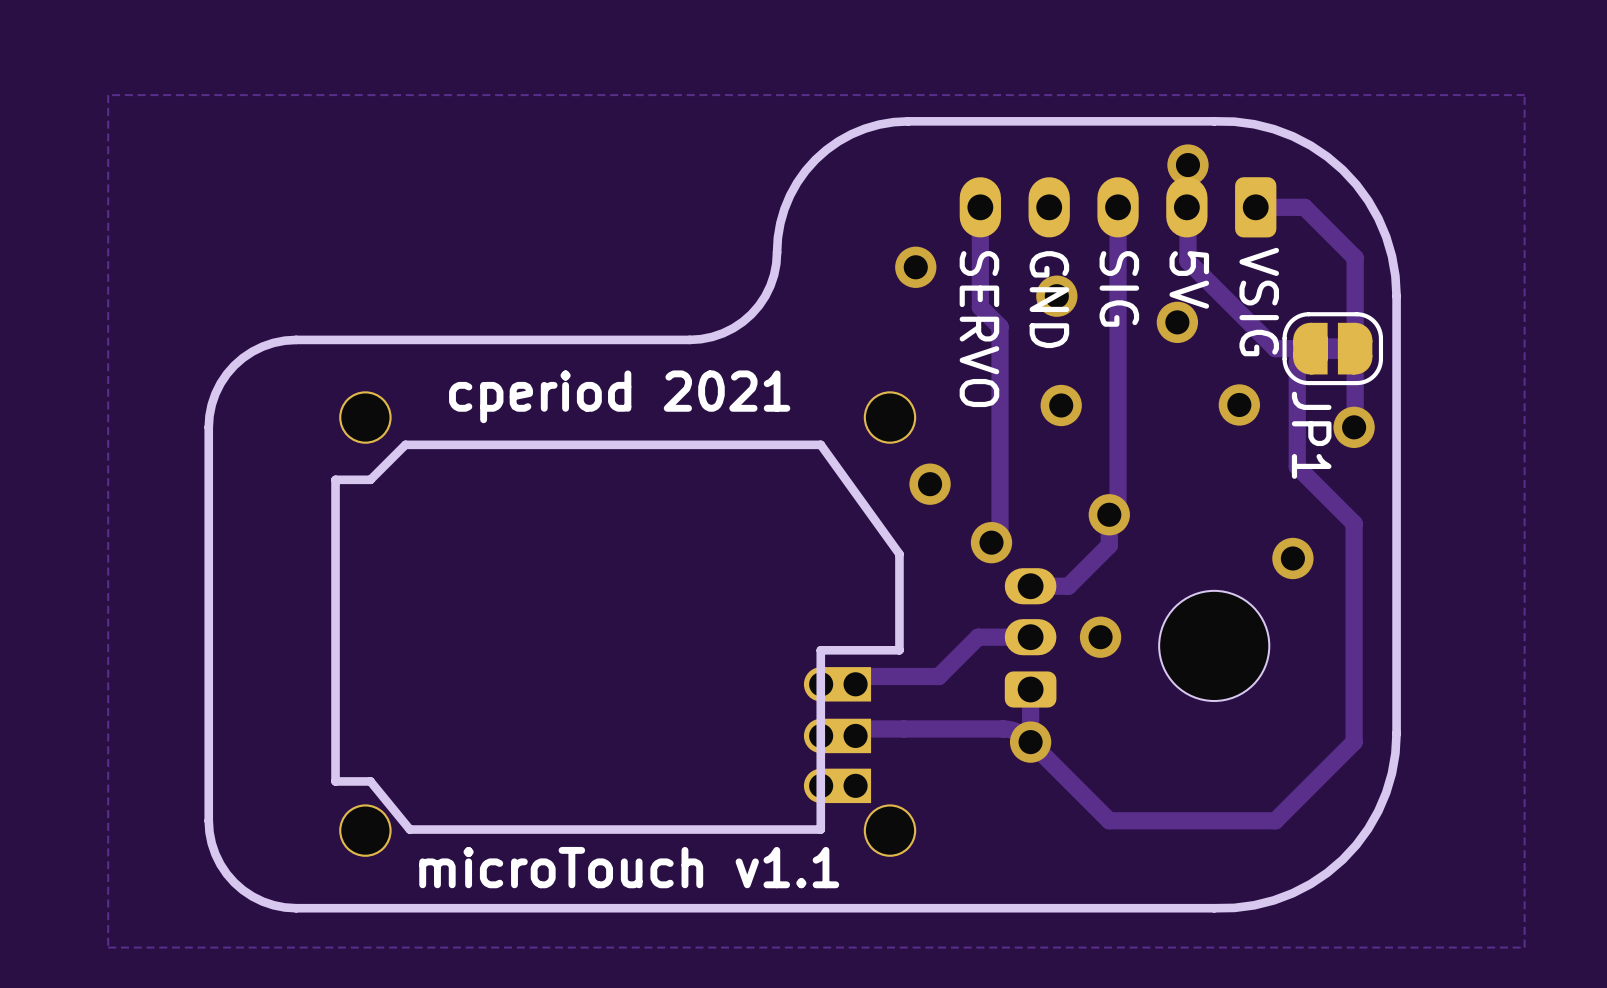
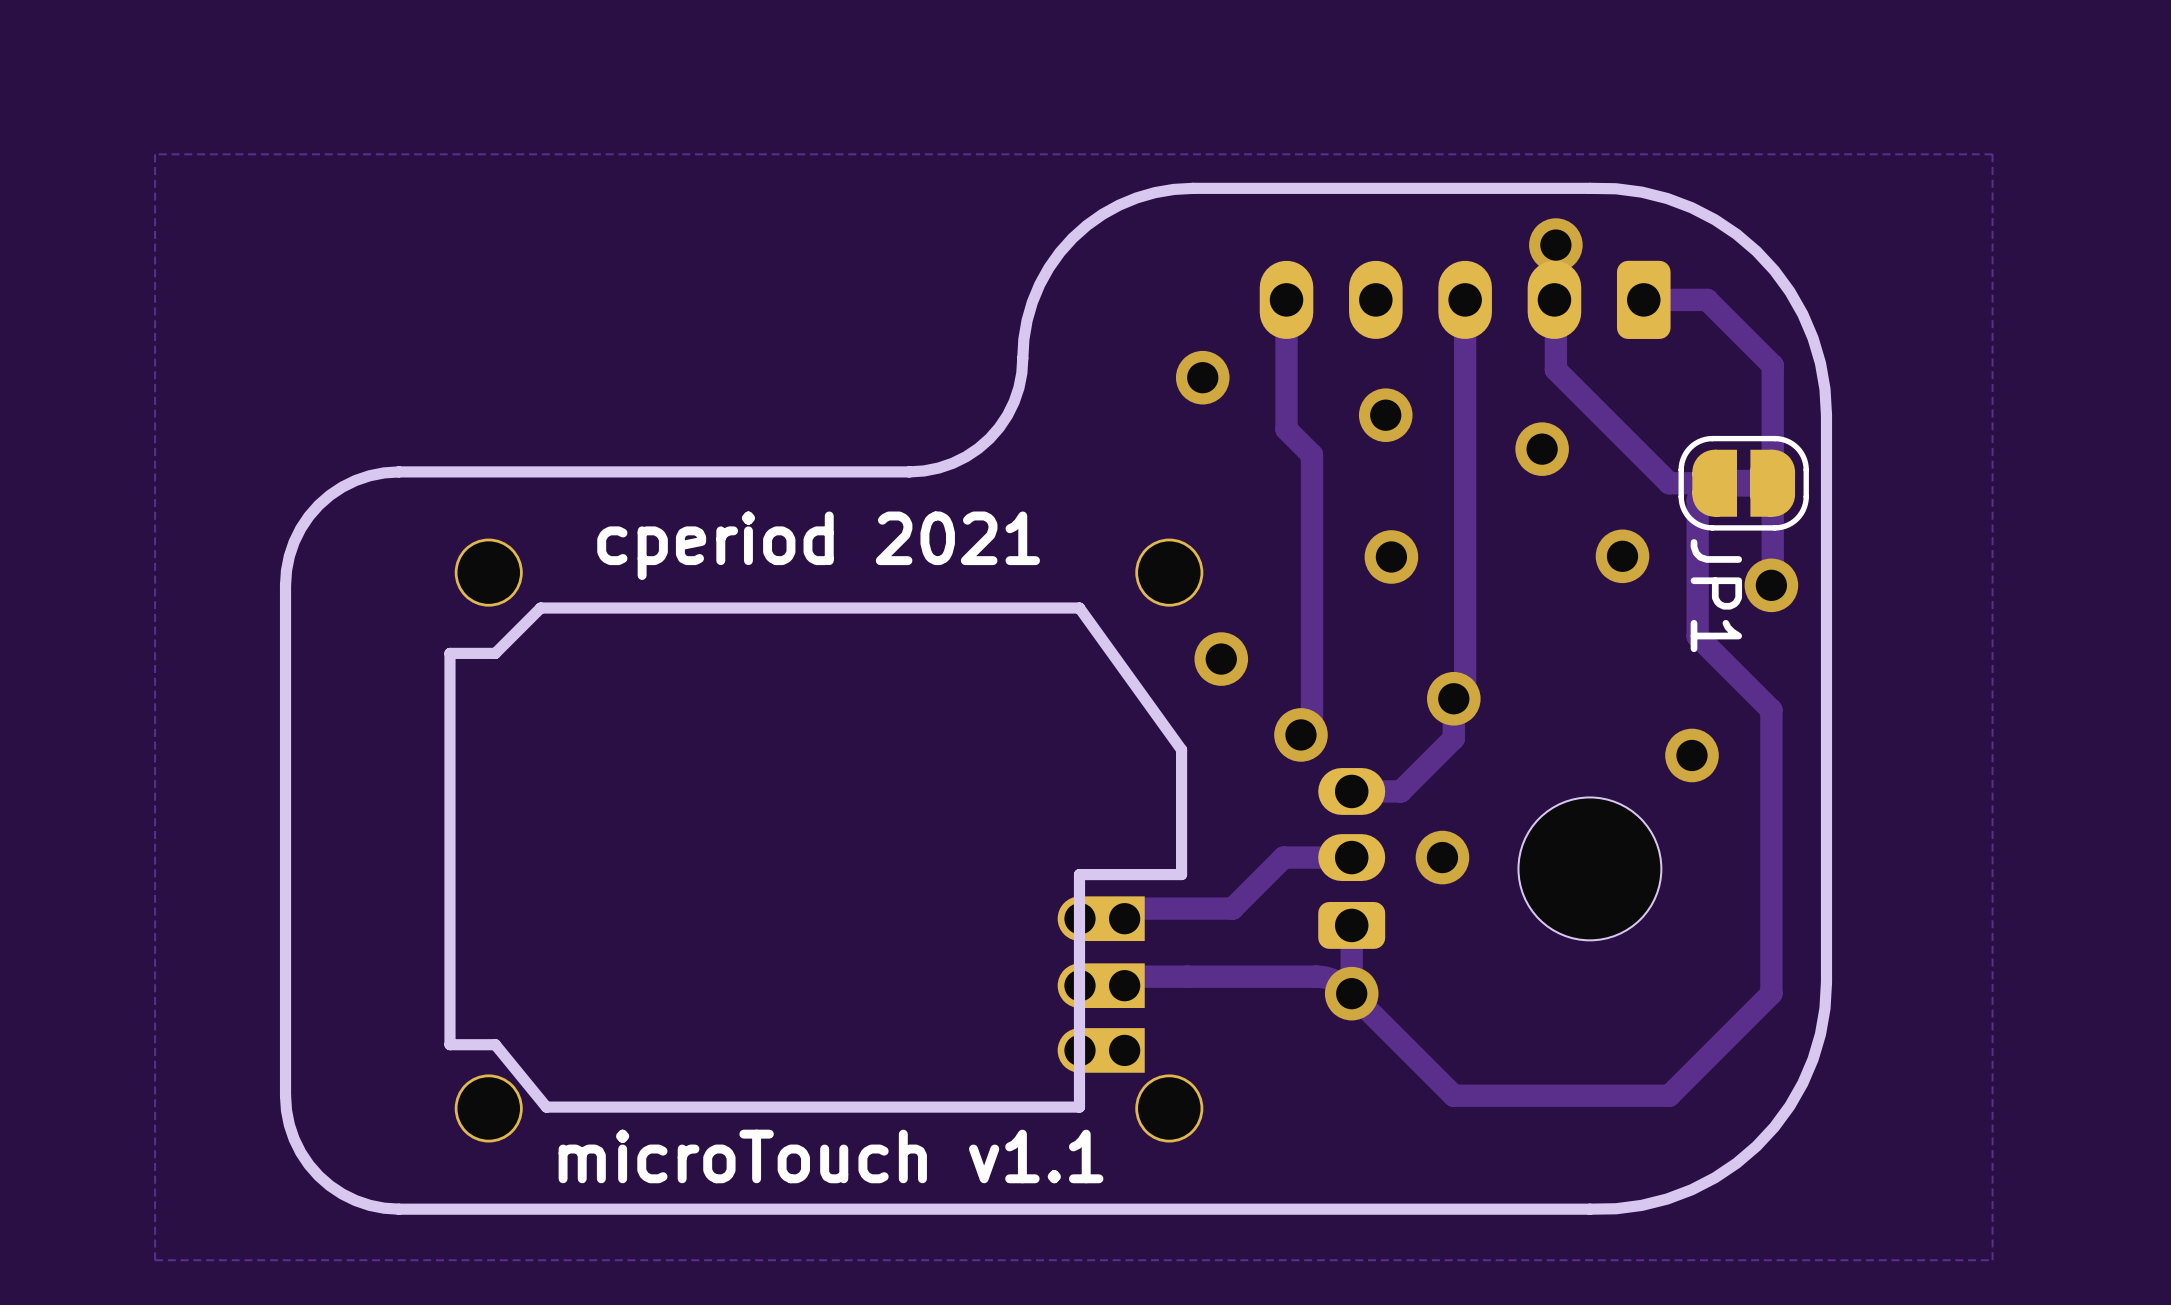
text: 5V (1189, 279) -> none
text: SIG (1119, 288) -> none
text: GND (1049, 299) -> none
text: VSIG (1259, 302) -> none
text: SERVO (979, 329) -> none

